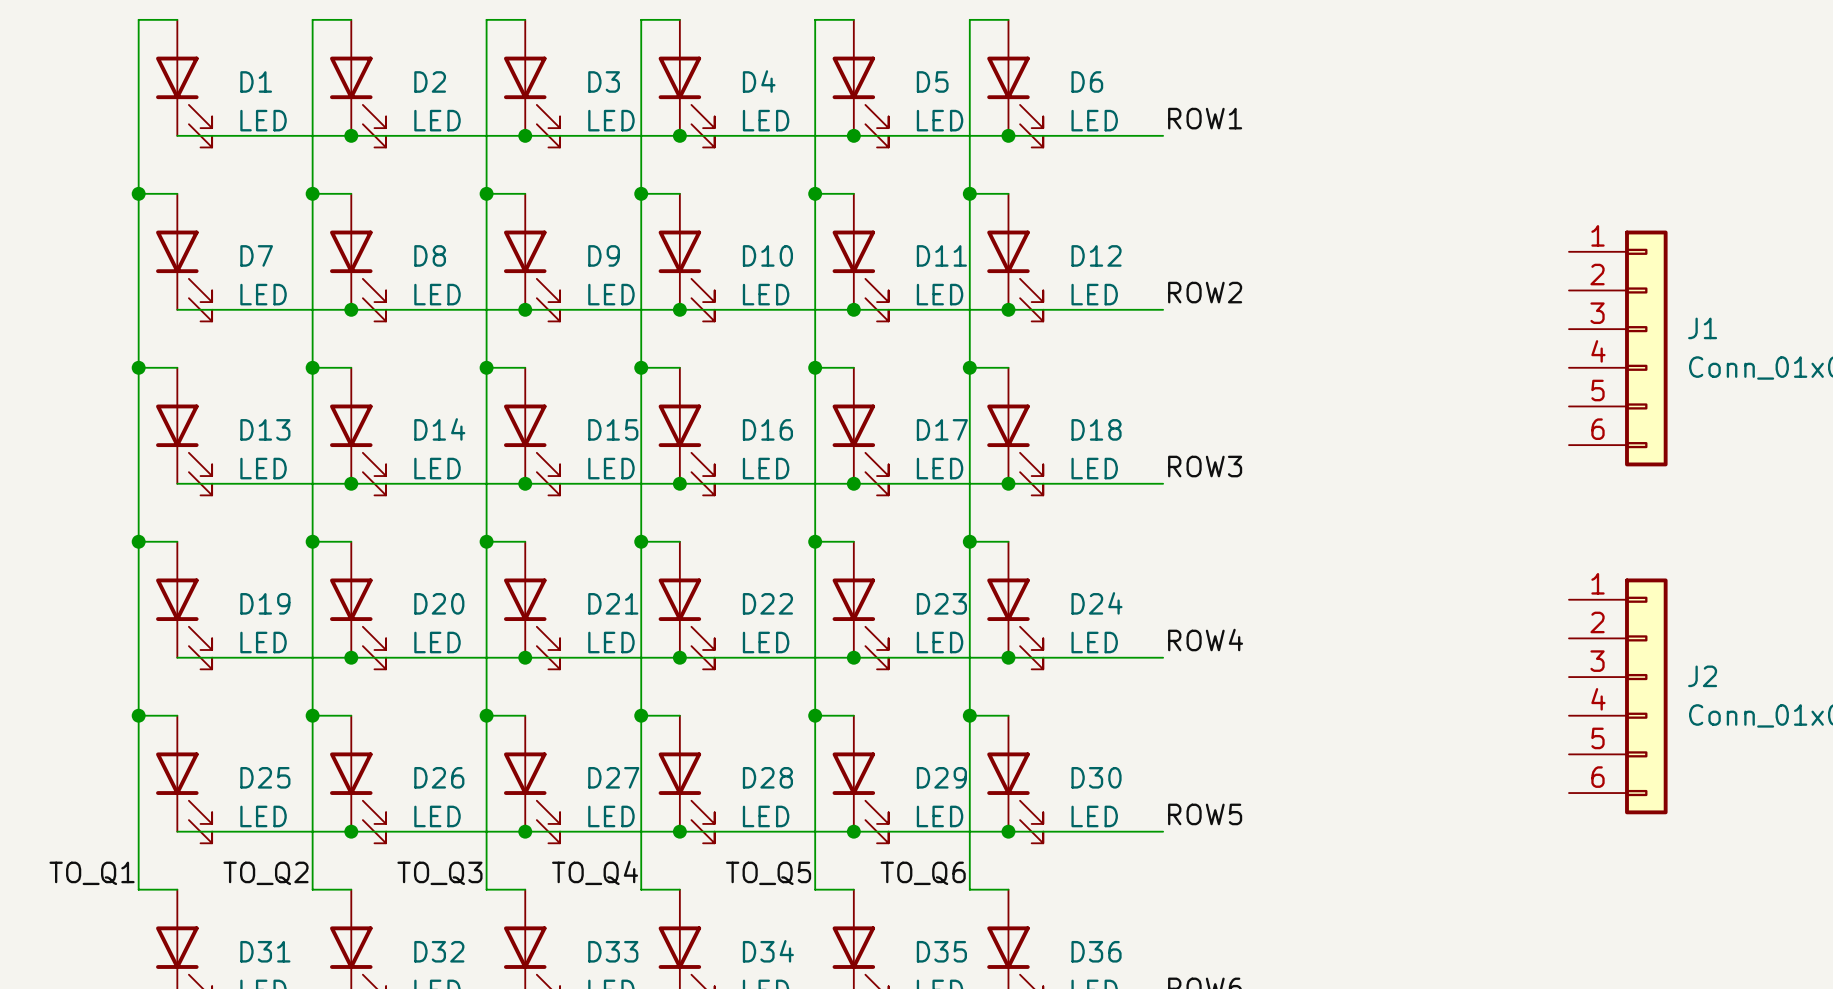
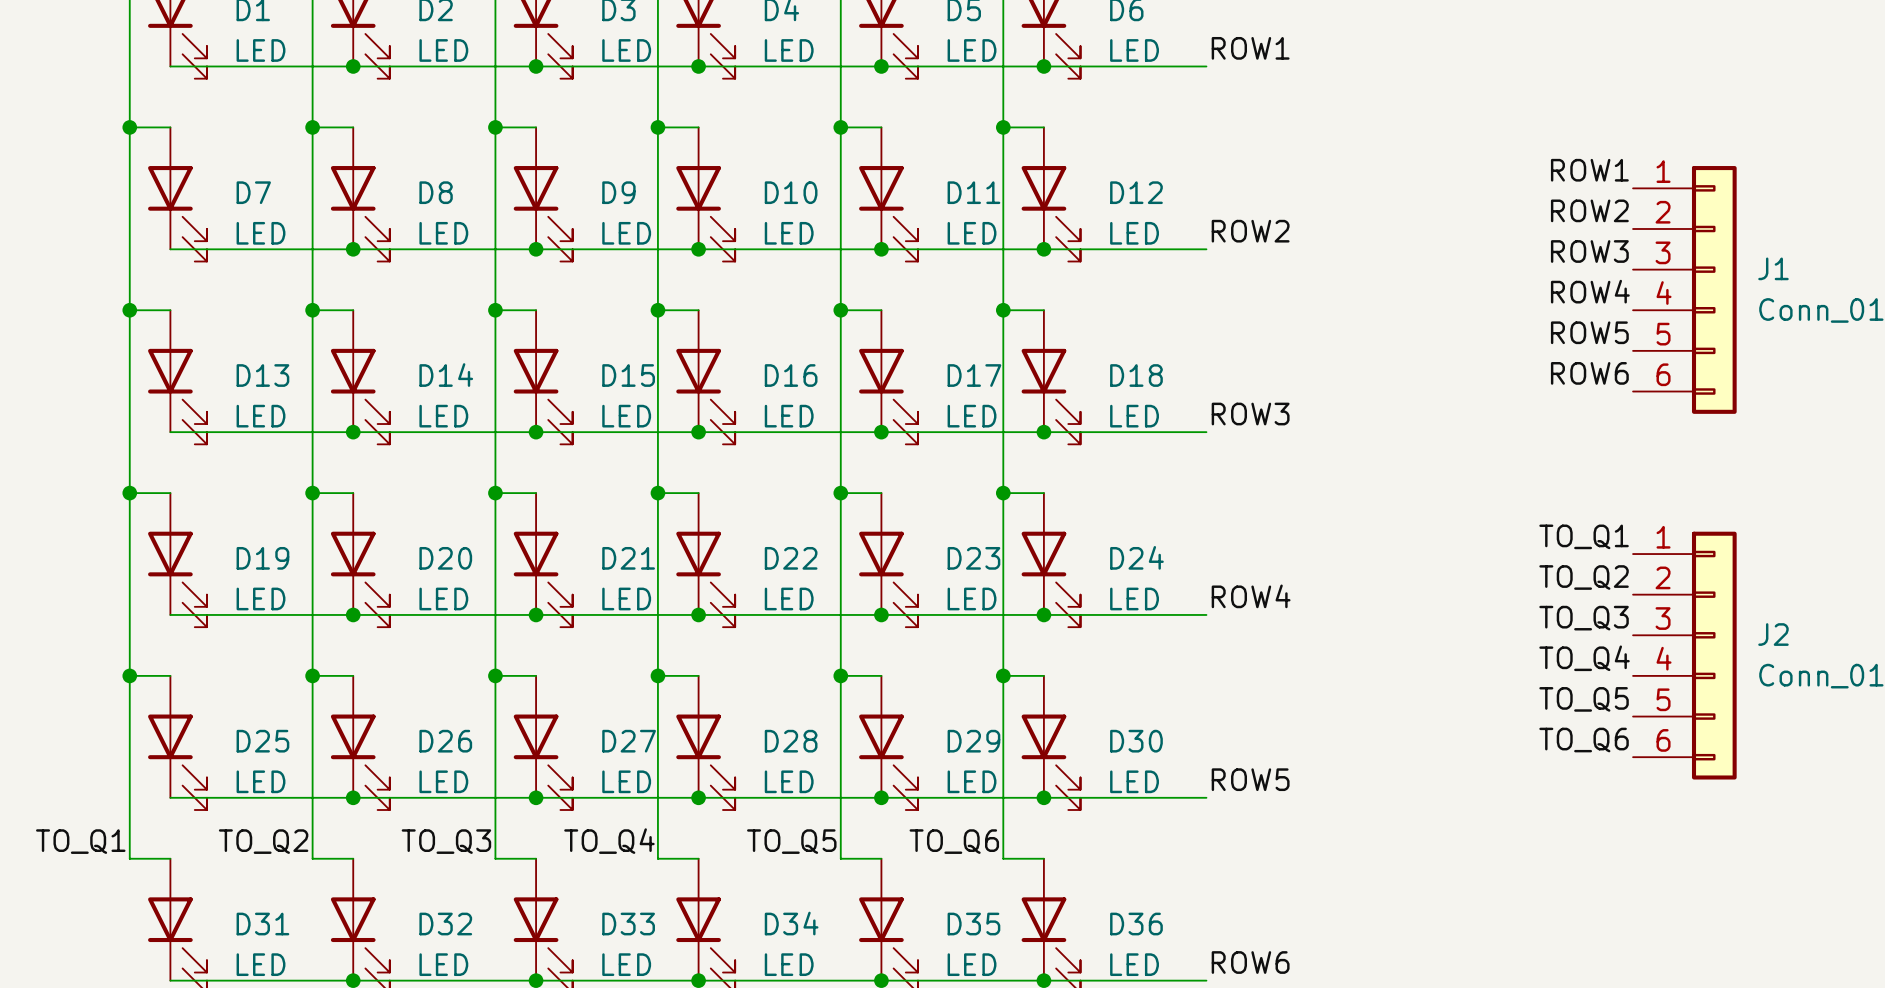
label: none -> ROW1 (1589, 170)
label: none -> ROW2 (1589, 210)
label: none -> ROW3 (1589, 251)
label: none -> ROW4 (1590, 291)
label: none -> ROW5 (1589, 332)
label: none -> ROW6 (1589, 373)
label: none -> TO_Q1 (1584, 536)
label: none -> TO_Q2 (1584, 577)
label: none -> TO_Q3 (1584, 618)
label: none -> TO_Q4 (1584, 658)
label: none -> TO_Q5 (1584, 699)
label: none -> TO_Q6 (1584, 740)

